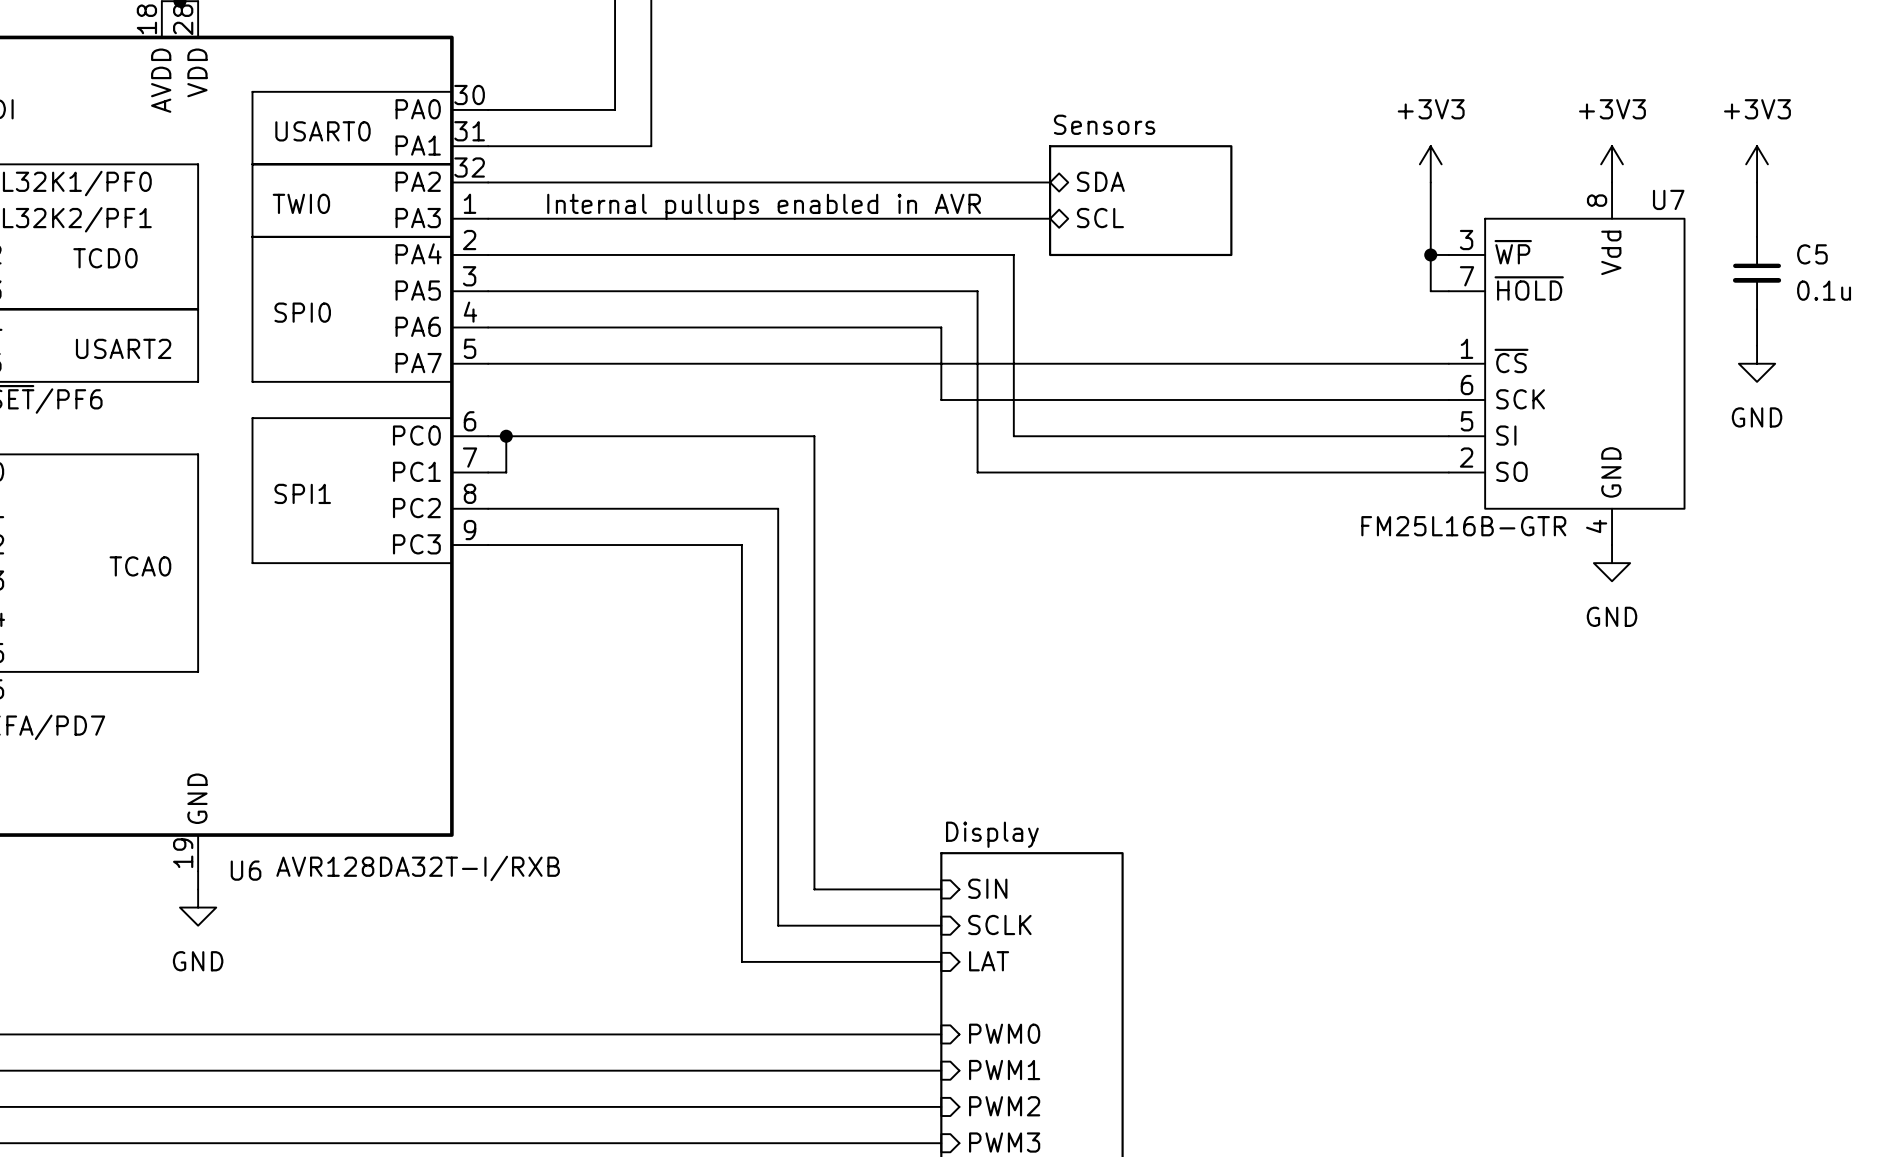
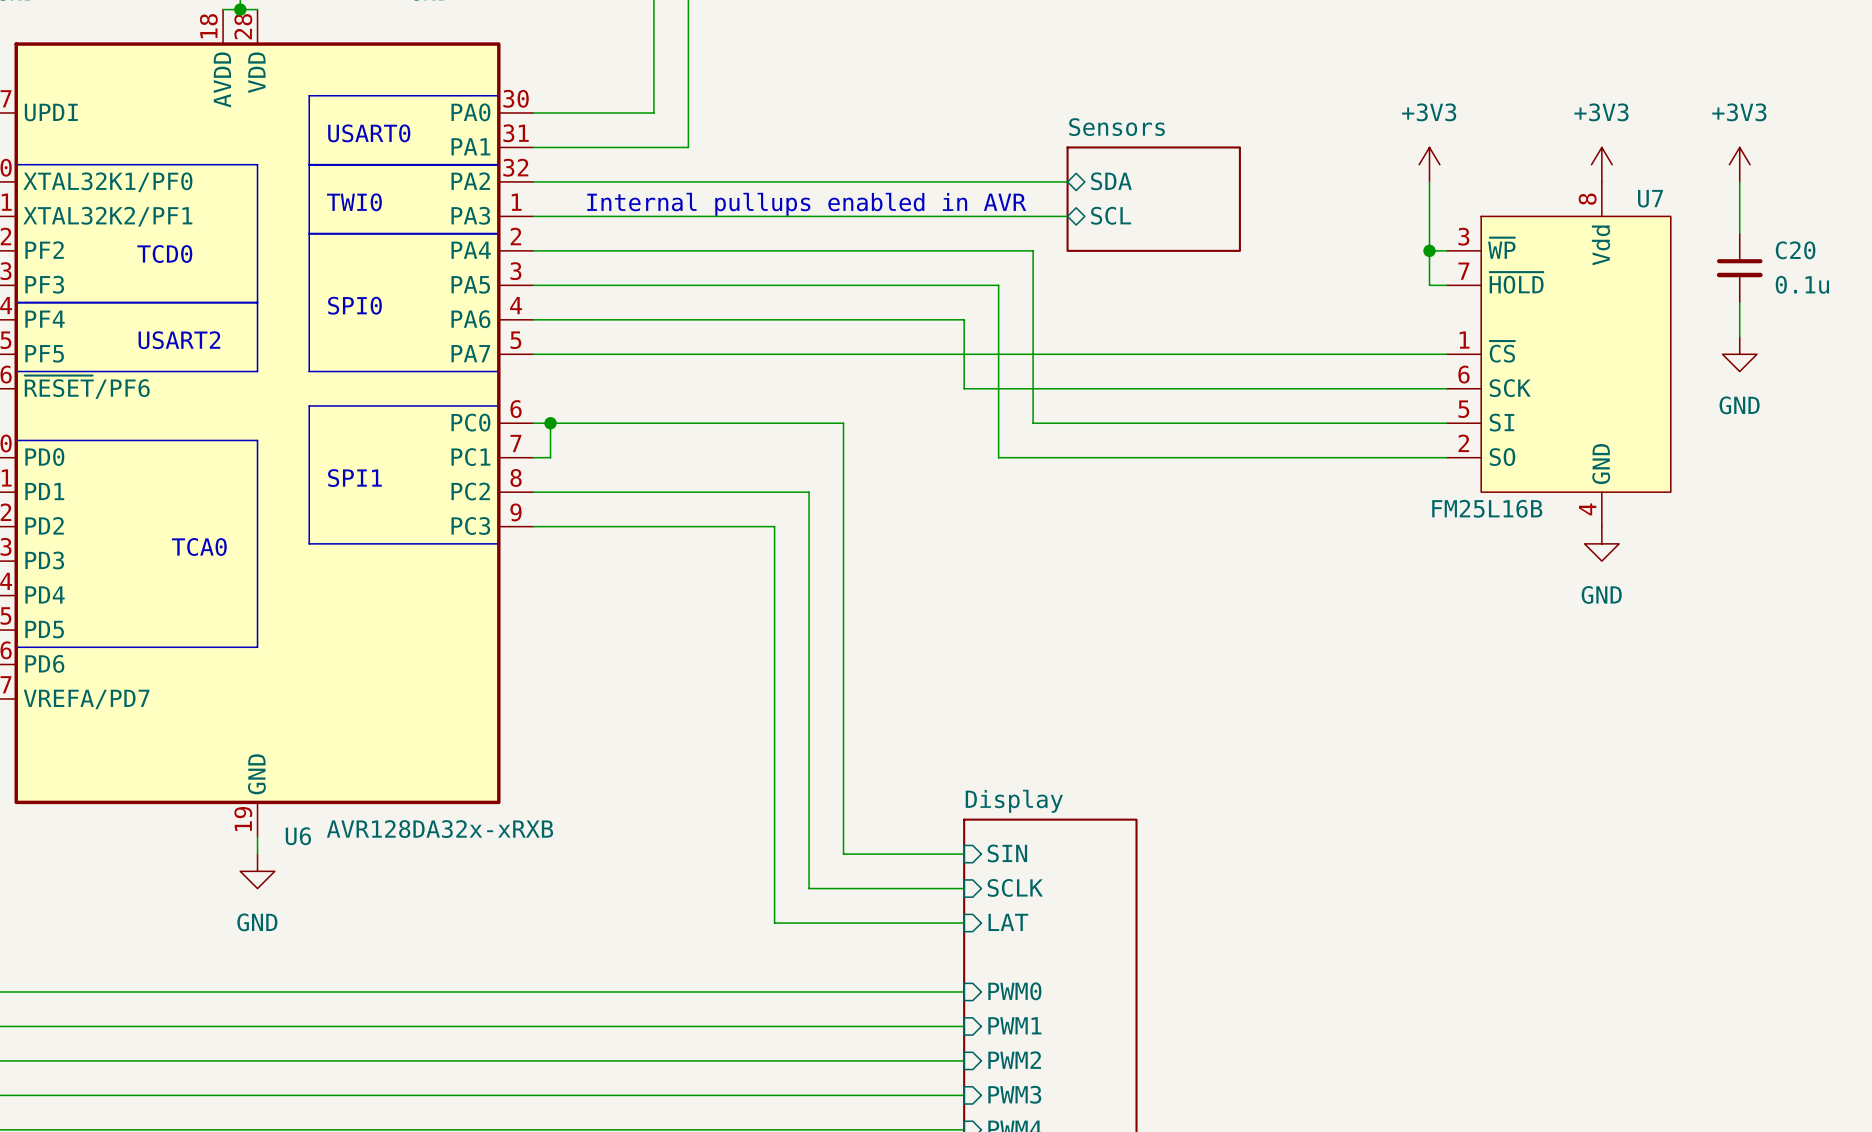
C5 name: C5 (1812, 254) -> C20 (1795, 250)
U7 value: FM25L16B-GTR (1463, 526) -> FM25L16B (1487, 508)
U6 value: AVR128DA32T-I/RXB (418, 868) -> AVR128DA32x-xRXB (439, 829)

